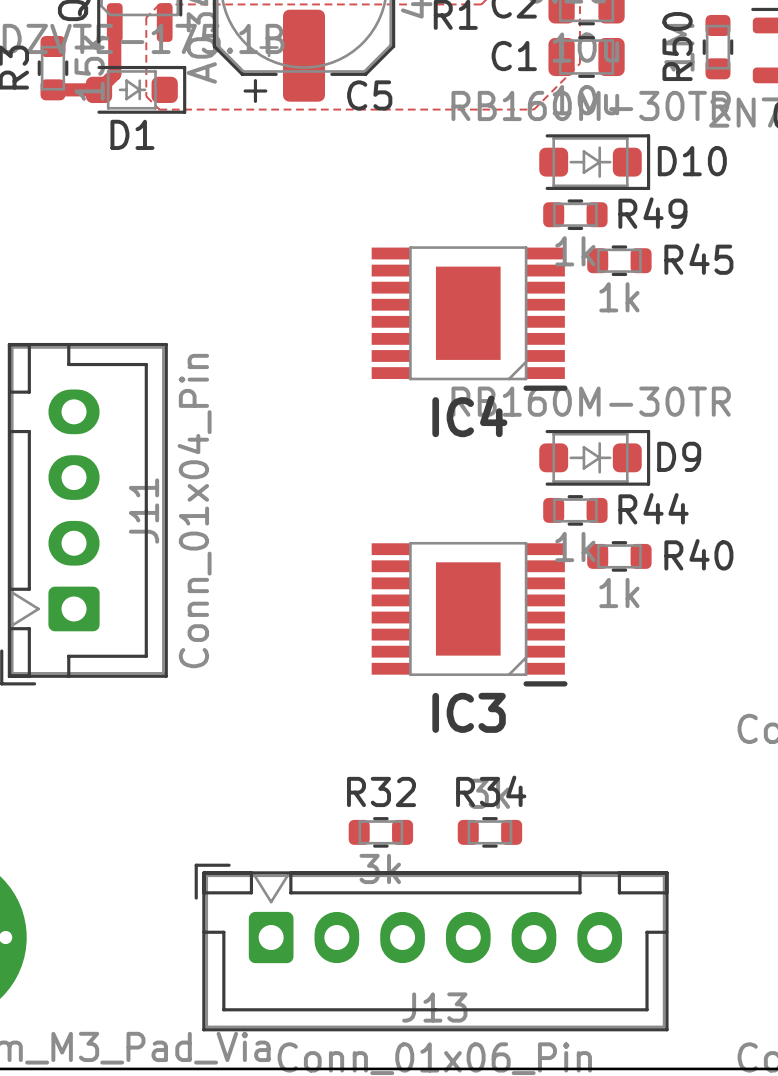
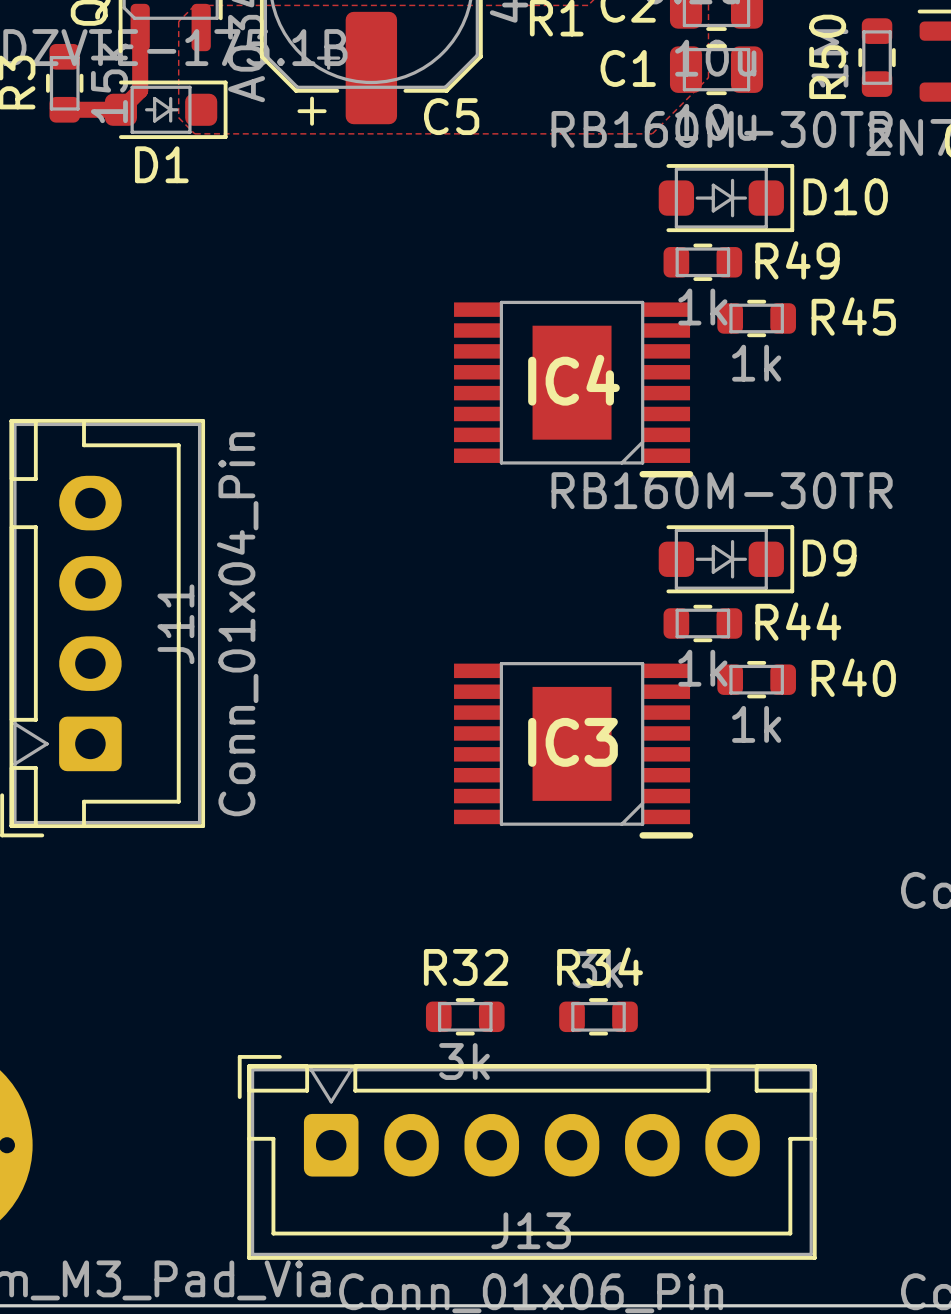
IC4 name position: IC4 (469, 416) -> IC4 (573, 380)
IC3 name position: IC3 (469, 712) -> IC3 (573, 742)

